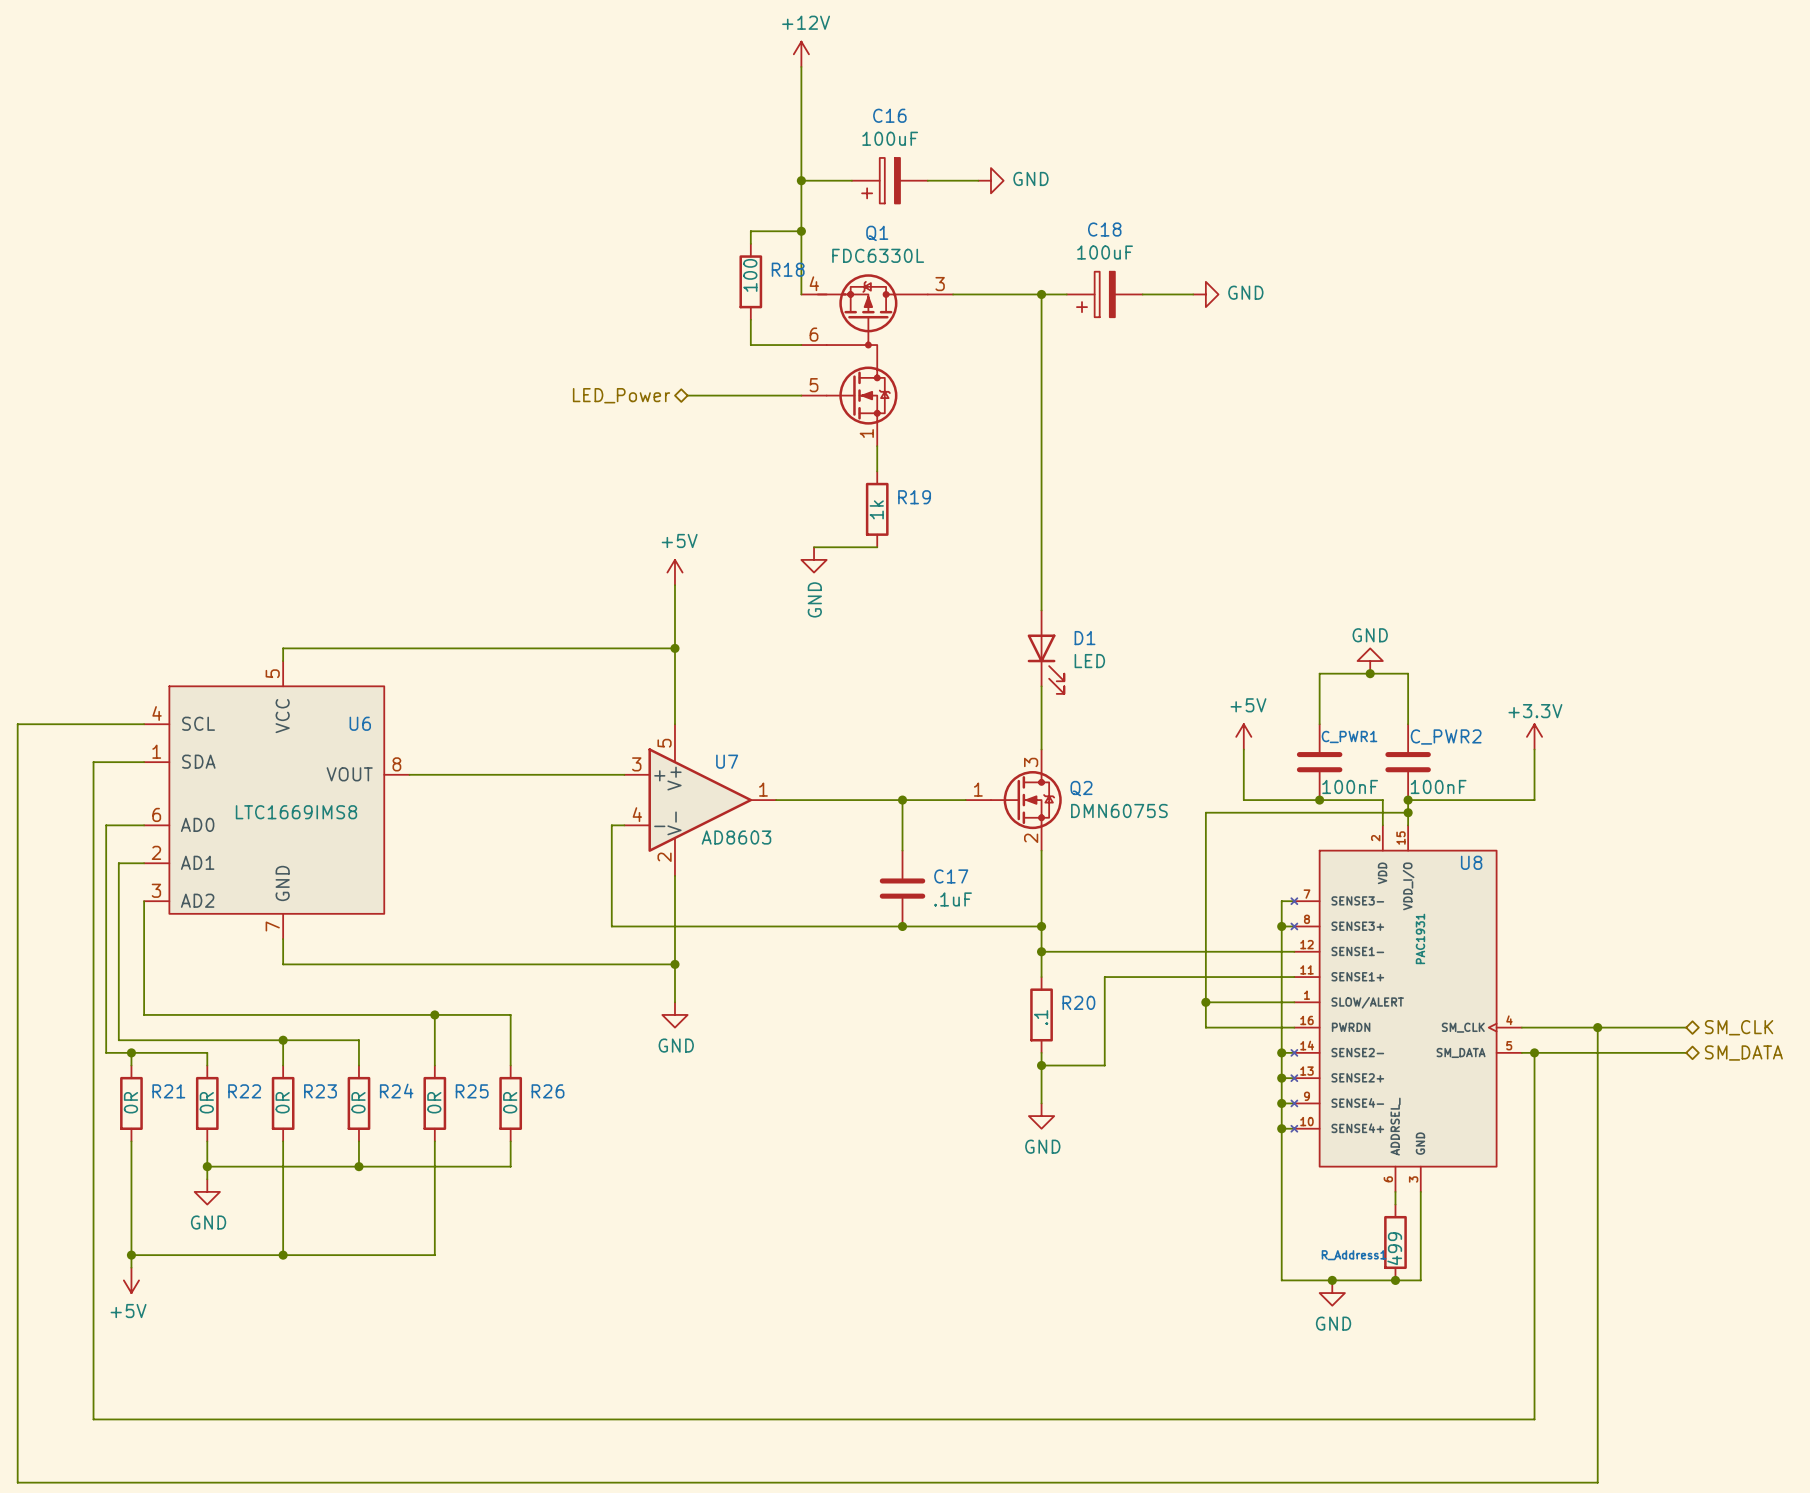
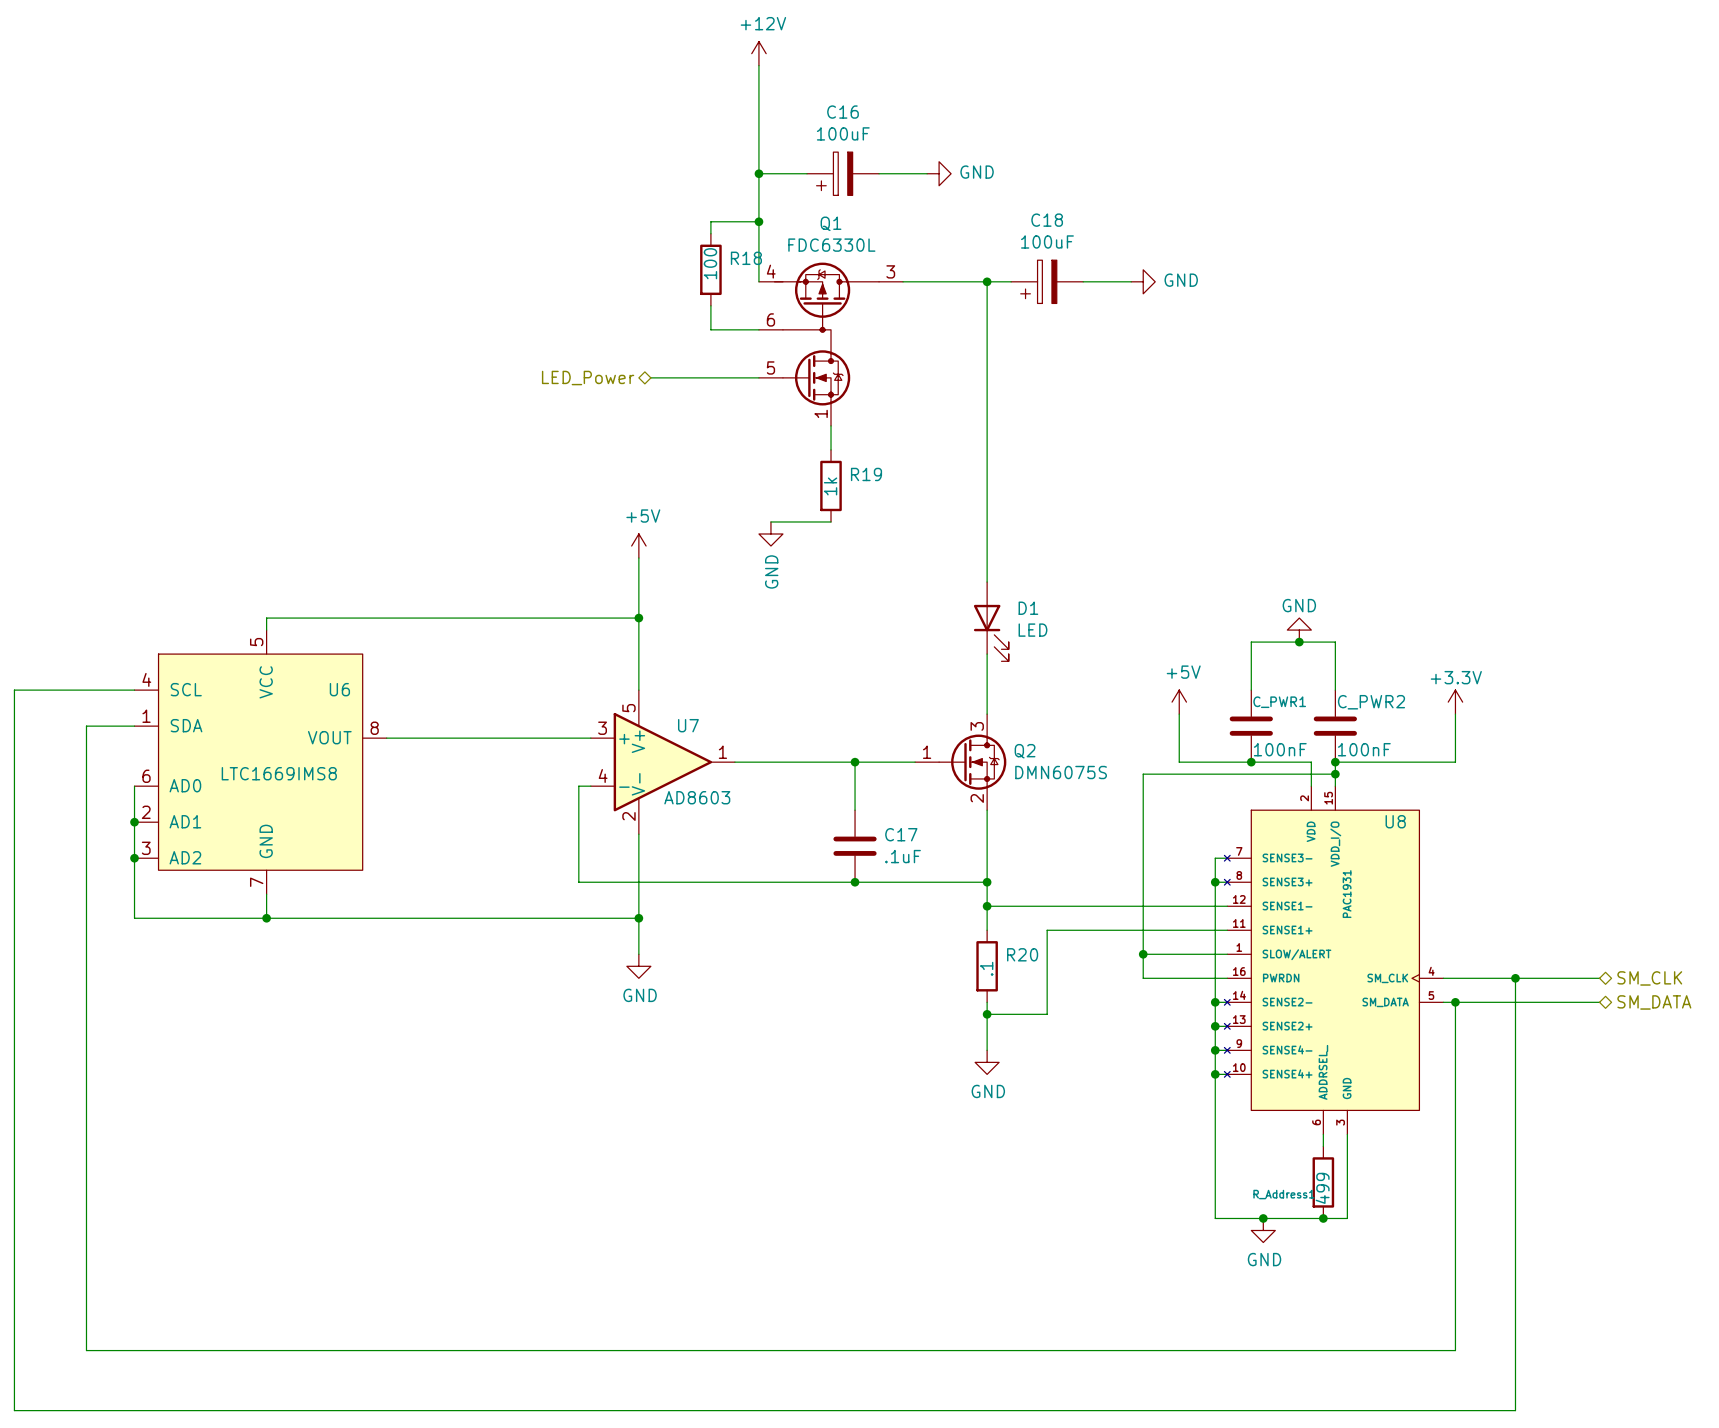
wire: (144, 825) (106, 825) (106, 1052) (207, 1052) (207, 1065) -> (134, 786) (134, 858)
wire: (144, 863) (118, 863) (118, 1040) (358, 1040) (358, 1065) -> none
junction: none -> (134, 822)
junction: none -> (134, 858)
wire: (144, 964) (144, 1014) (510, 1014) (510, 1065) -> (134, 918) (266, 918)
junction: none -> (266, 918)
wire: (434, 1014) (434, 1065) -> none
junction: (434, 1014) -> none
wire: (283, 1040) (283, 1065) -> none
junction: (283, 1040) -> none
wire: (131, 1052) (131, 1065) -> none
junction: (131, 1052) -> none
R21: 0R (131, 1103) -> none
R22: 0R (207, 1103) -> none
R23: 0R (283, 1103) -> none
R24: 0R (358, 1103) -> none
R25: 0R (434, 1103) -> none
R26: 0R (510, 1103) -> none
wire: (131, 1141) (131, 1267) -> none
wire: (207, 1141) (207, 1179) -> none
wire: (283, 1141) (283, 1255) -> none
wire: (358, 1141) (358, 1166) -> none
wire: (434, 1141) (434, 1255) (131, 1255) -> none
wire: (510, 1141) (510, 1166) (207, 1166) -> none
junction: (207, 1166) -> none
junction: (358, 1166) -> none
power symbol: GND (207, 1191) -> none
junction: (131, 1255) -> none
junction: (283, 1255) -> none
power symbol: +5V (131, 1280) -> none

